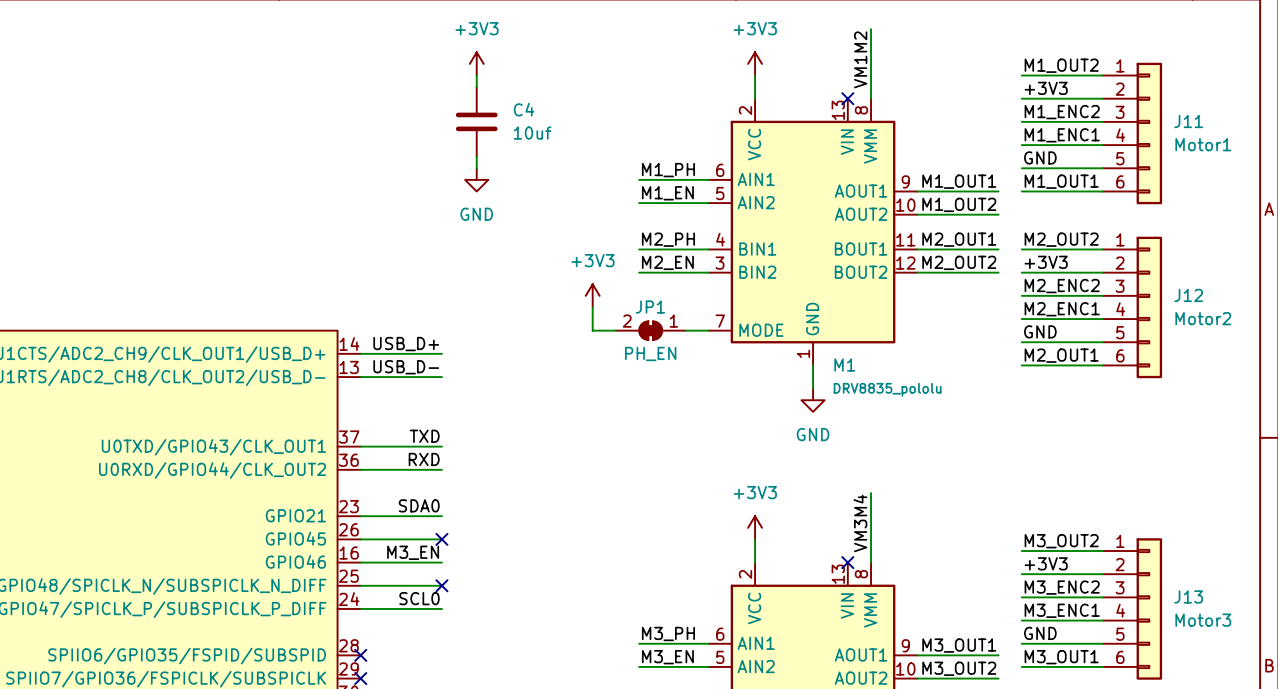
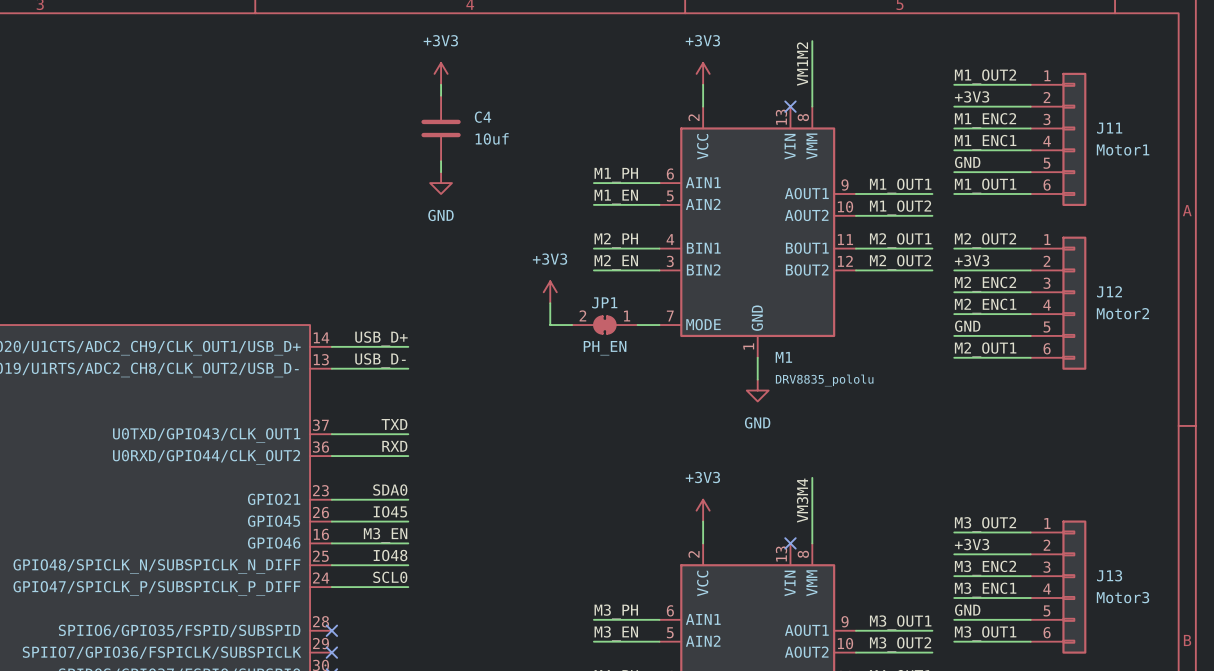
label: none -> IO45 (390, 511)
no-connect mark: (441, 539) -> none
label: none -> IO48 (390, 555)
no-connect mark: (441, 585) -> none

